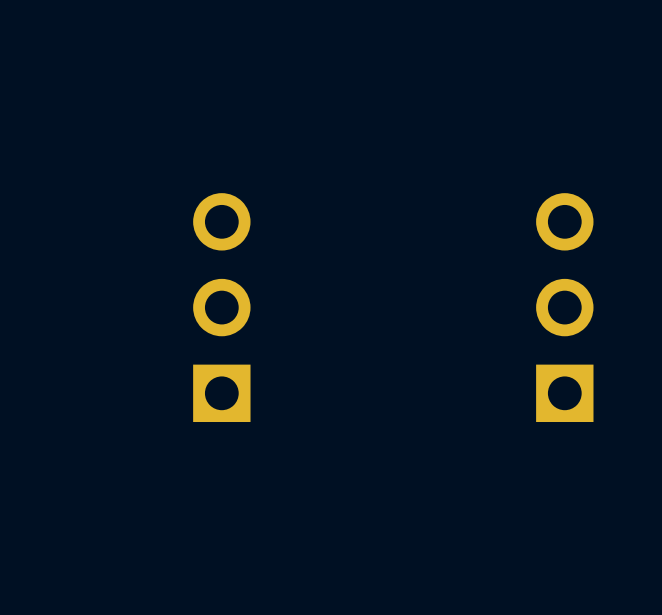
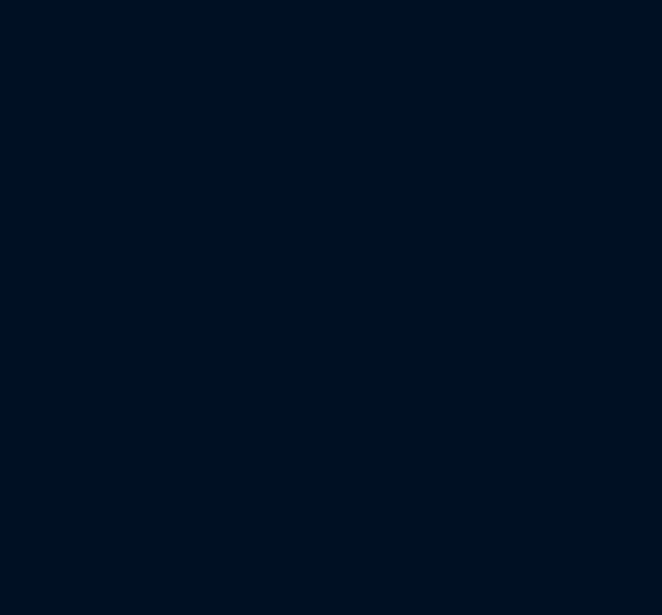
part: (221, 307) -> none
part: (564, 307) -> none

